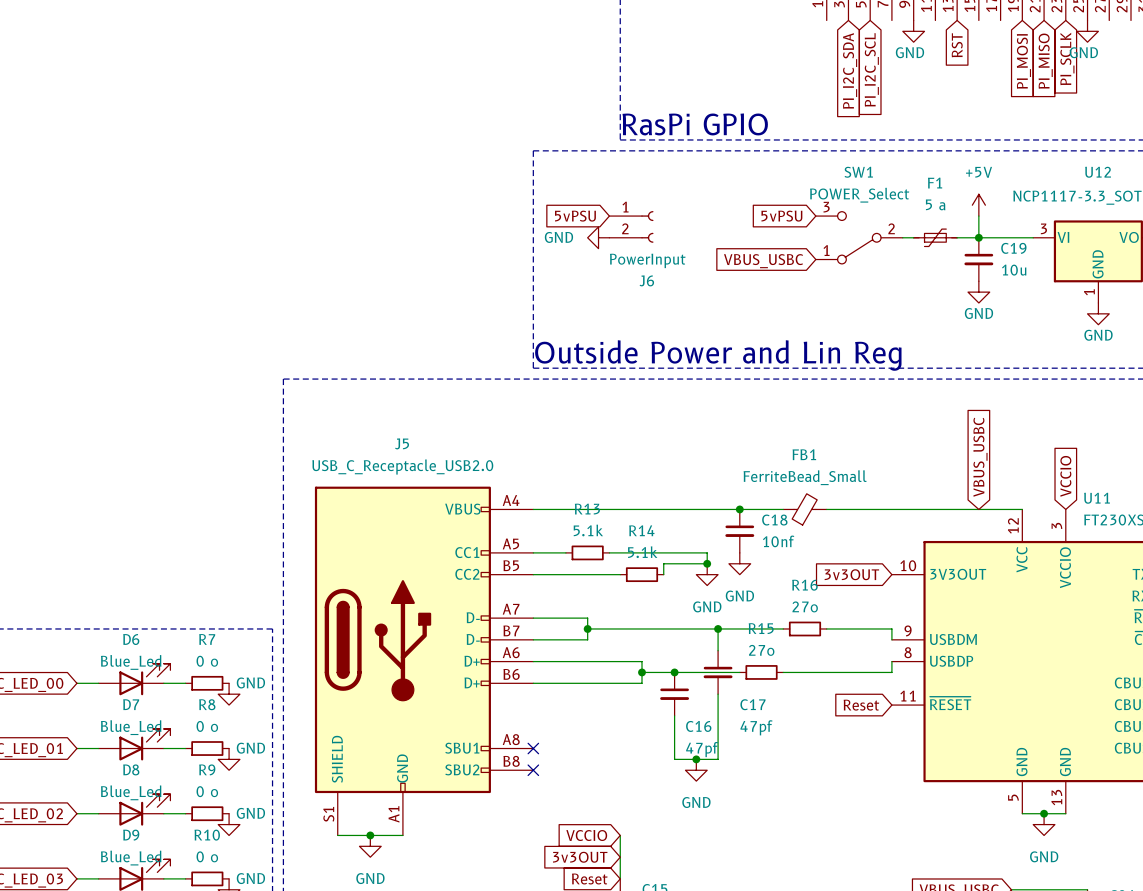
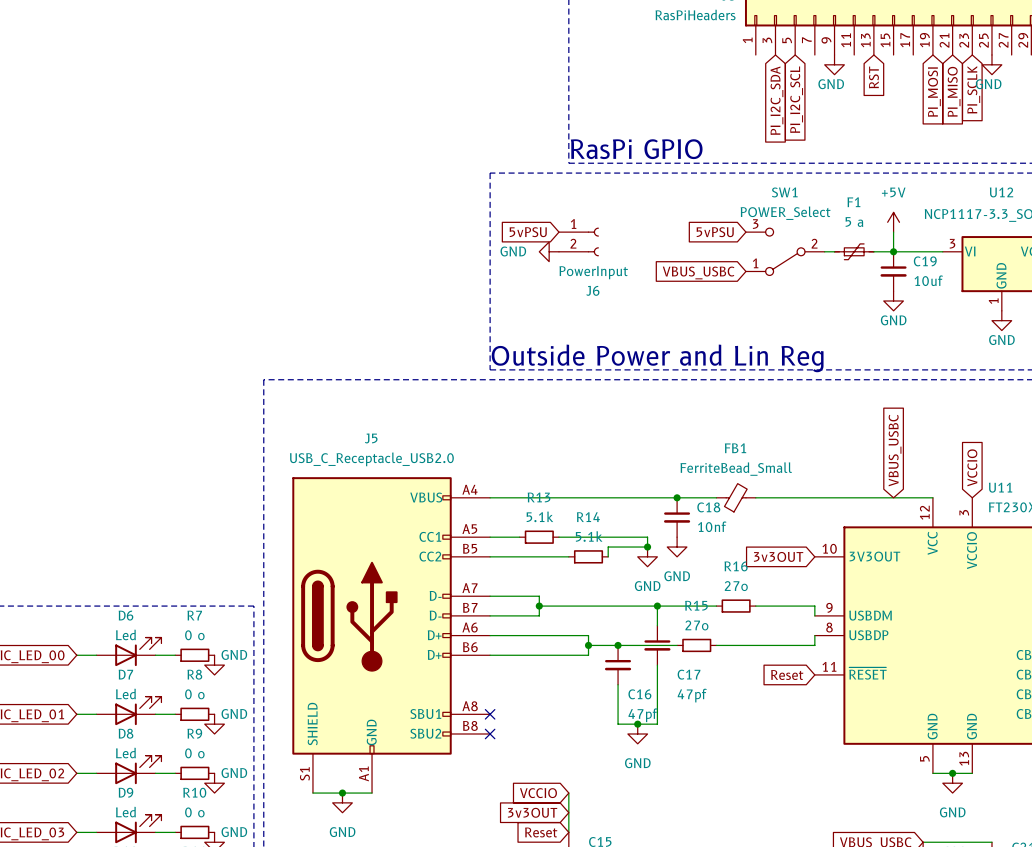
C19 value: 10u (1014, 270) -> 10uf (928, 280)
D6 value: Blue_Led (131, 662) -> Led (125, 634)
D7 value: Blue_Led (131, 727) -> Led (125, 694)
D8 value: Blue_Led (131, 792) -> Led (125, 753)
D9 value: Blue_Led (131, 858) -> Led (125, 812)

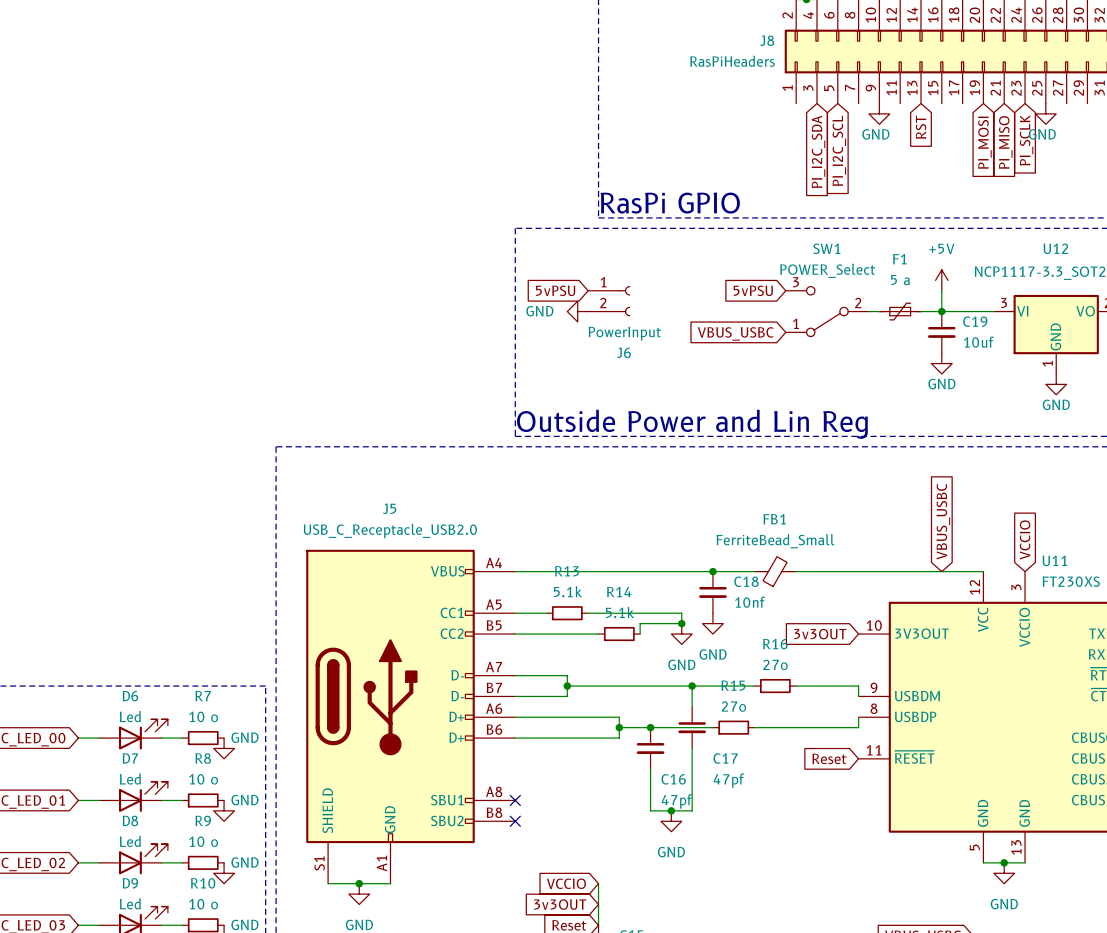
R7 value: 0 o (194, 635) -> 10 o (203, 716)
R8 value: 0 o (194, 694) -> 10 o (203, 779)
R9 value: 0 o (194, 753) -> 10 o (203, 841)
R10 value: 0 o (194, 812) -> 10 o (203, 904)

